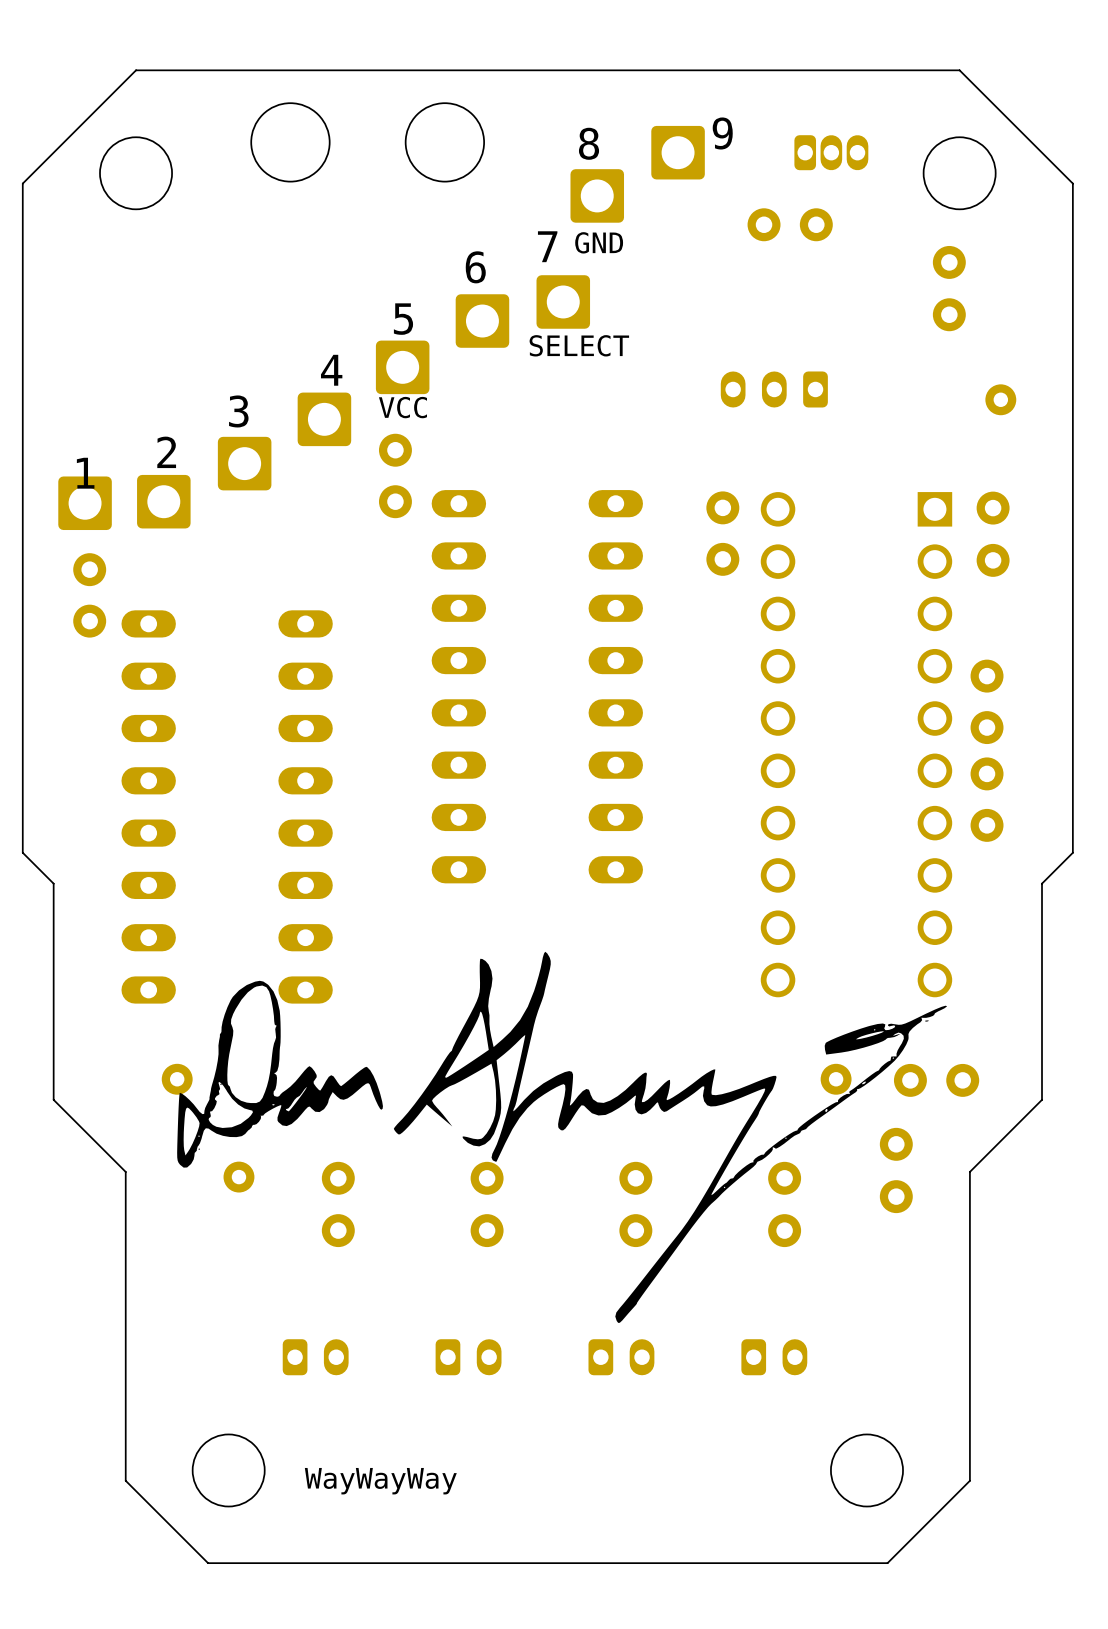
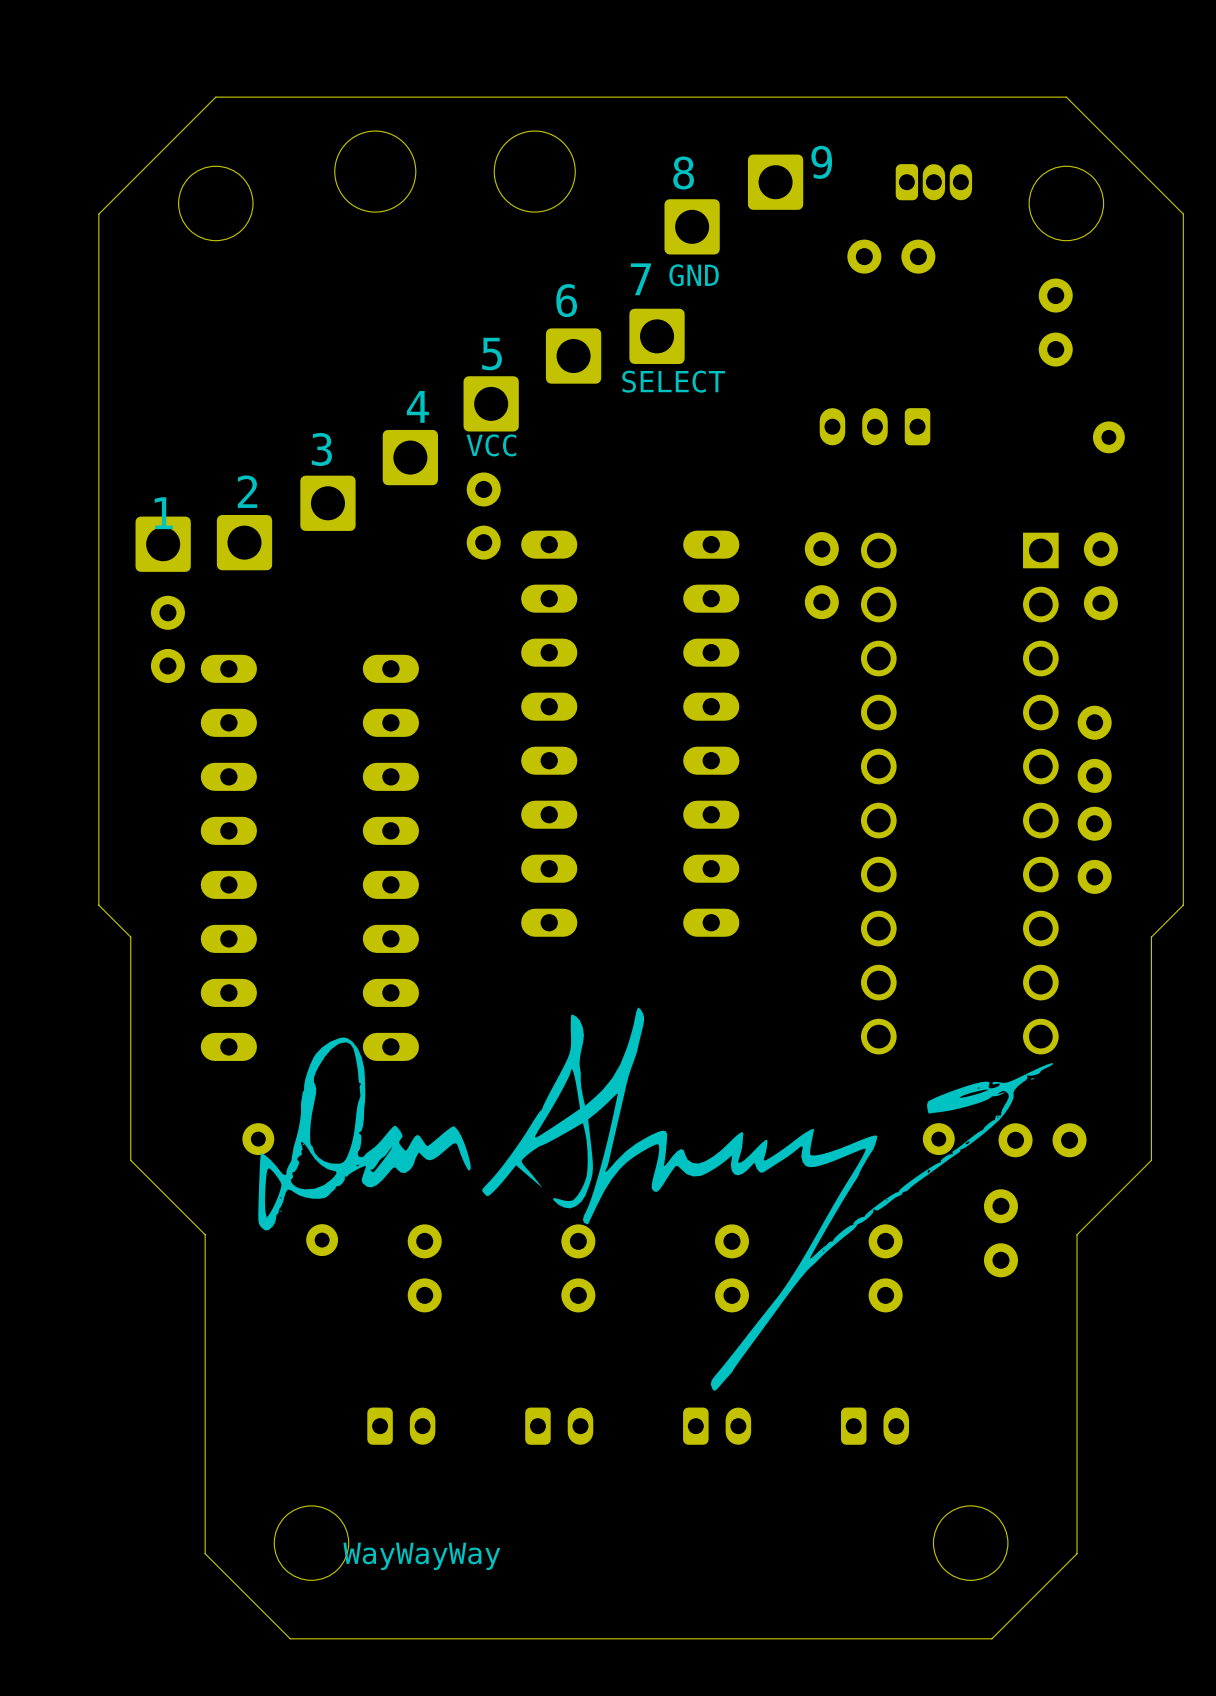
text position: WayWayWay (380, 1481) -> WayWayWay (421, 1556)

